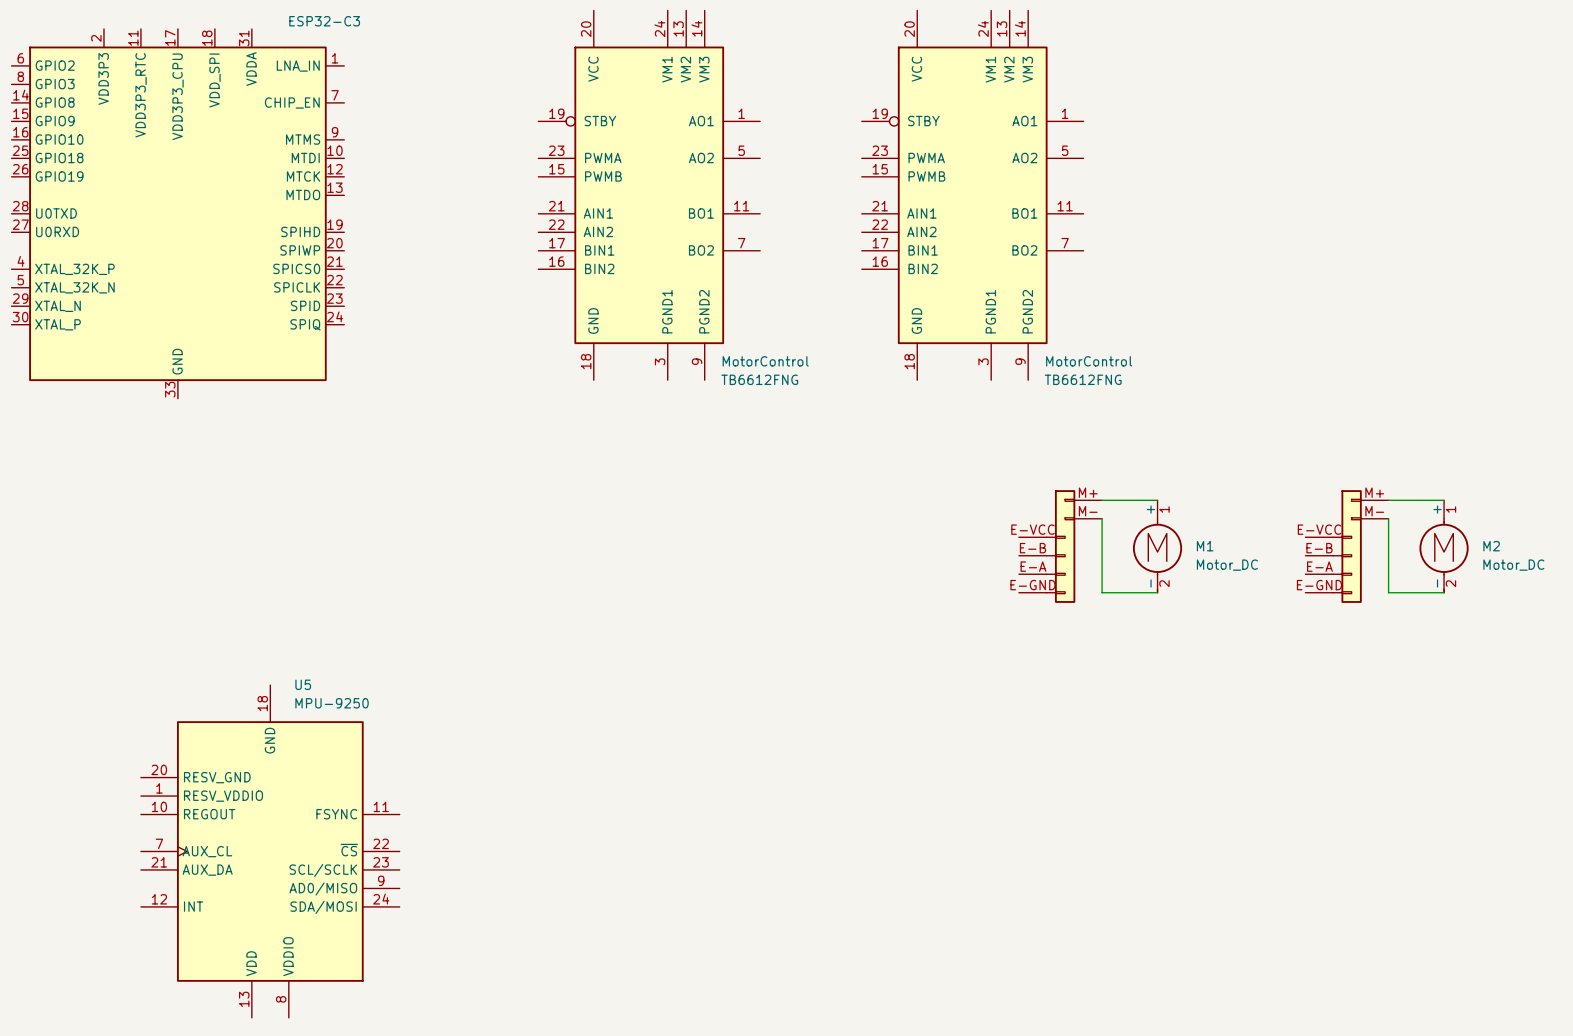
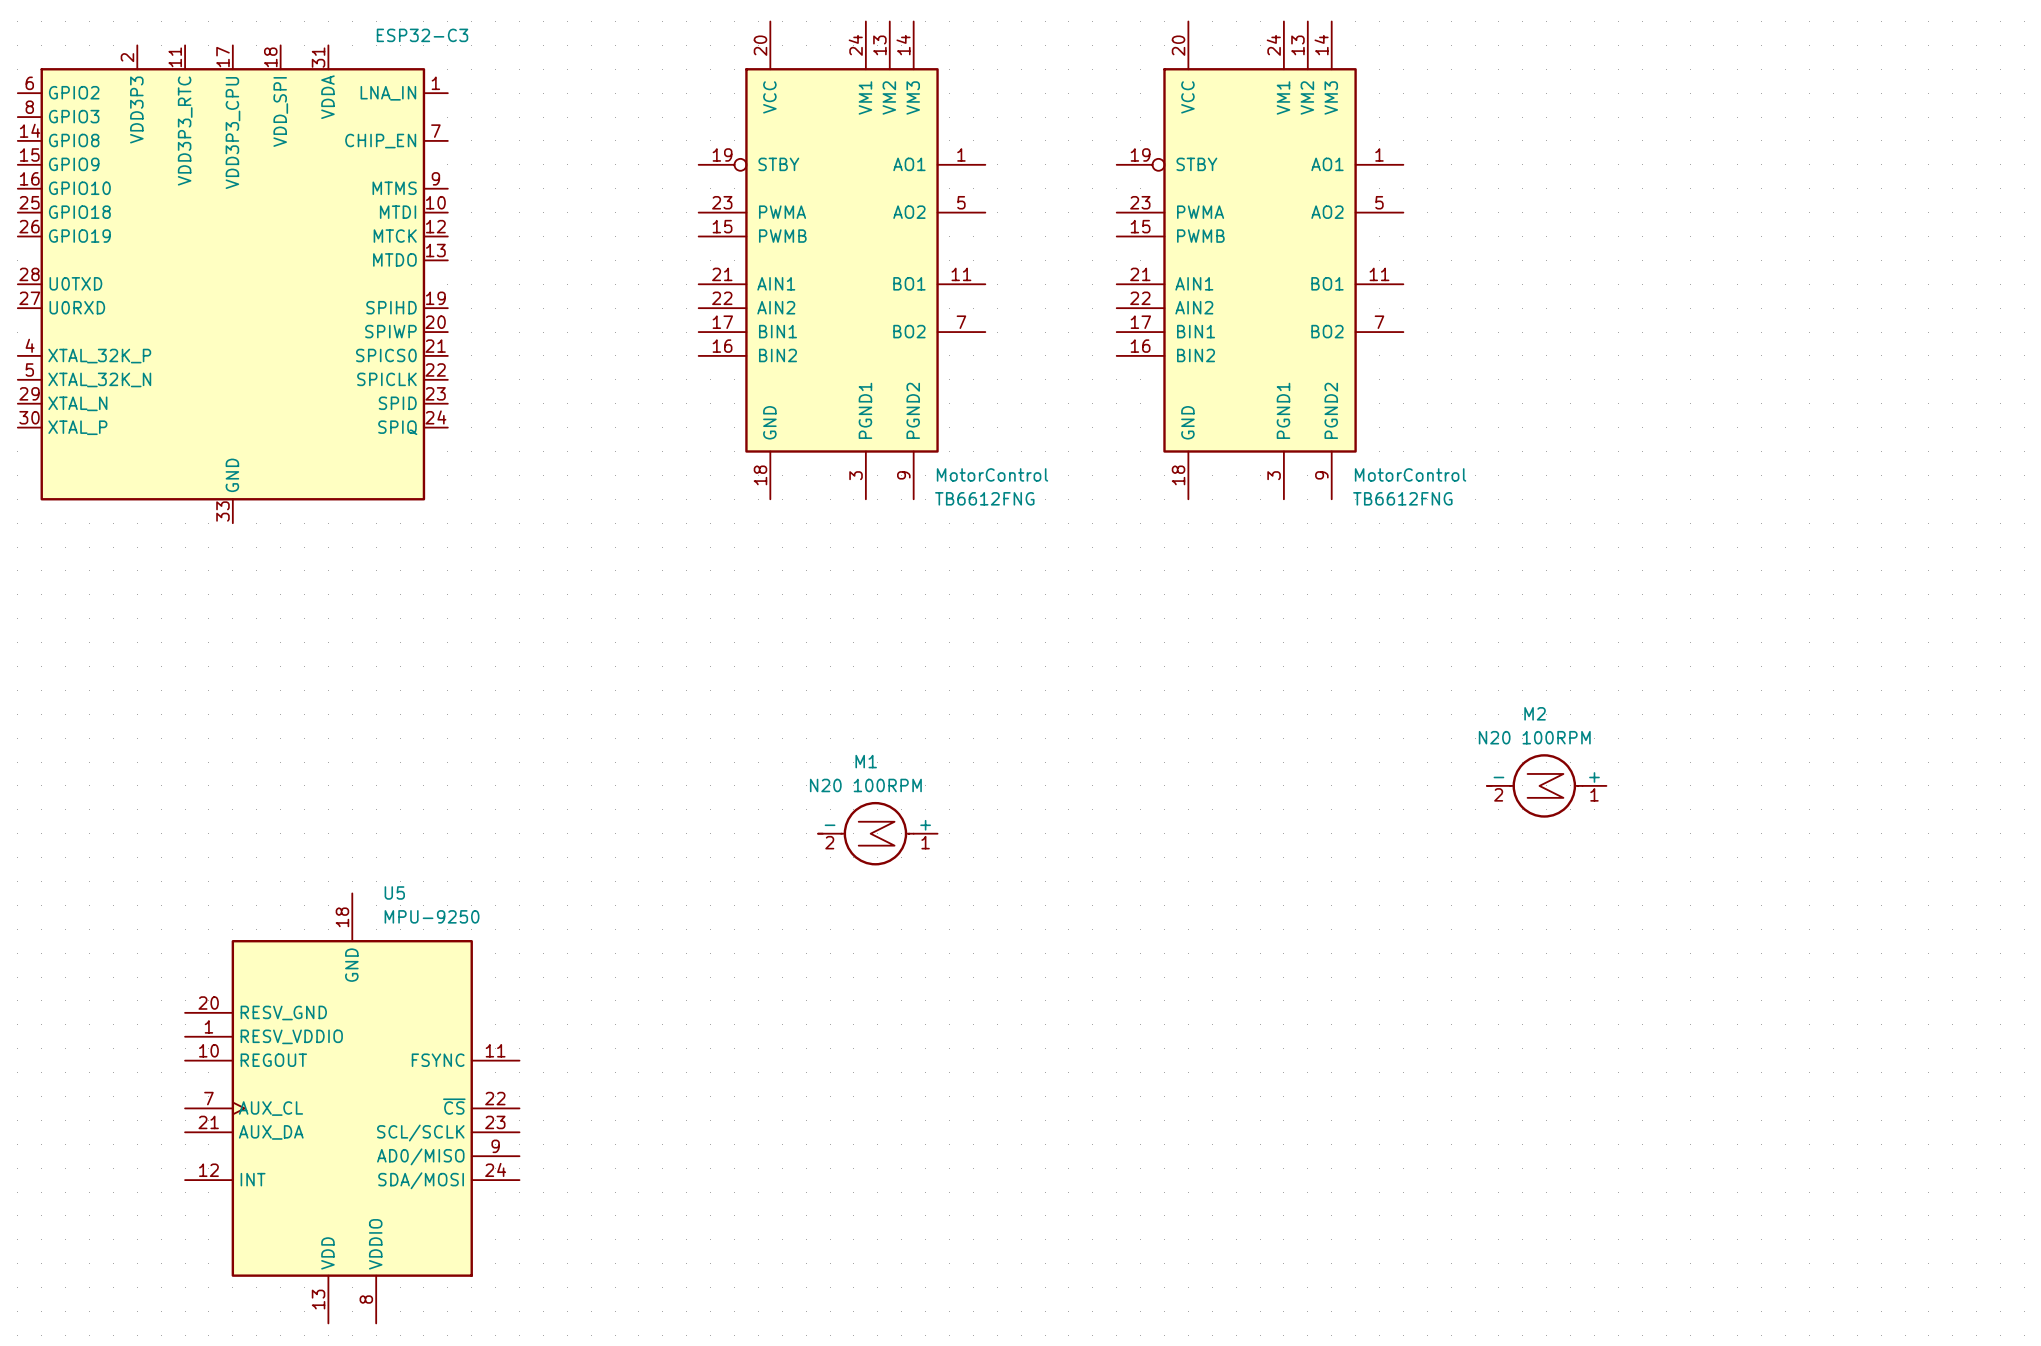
wire: (1102, 500) (1157, 500) -> none
wire: (1388, 500) (1444, 500) -> none
wire: (1102, 518) (1102, 592) (1157, 592) -> none
wire: (1388, 518) (1388, 592) (1444, 592) -> none
part: (1060, 546) -> none
M1 position: (1157, 546) -> (877, 833)
M1 name position: M1 (1205, 546) -> M1 (866, 761)
part: (1347, 546) -> none
M2 position: (1444, 546) -> (1546, 785)
M2 name position: M2 (1491, 546) -> M2 (1535, 713)
M1 rotation: 0° (1157, 555) -> 90° clockwise (865, 833)
M2 rotation: 0° (1444, 555) -> 90° clockwise (1534, 785)
M1 value: Motor_DC (1227, 565) -> N20 100RPM (865, 785)
M2 value: Motor_DC (1513, 565) -> N20 100RPM (1534, 737)

